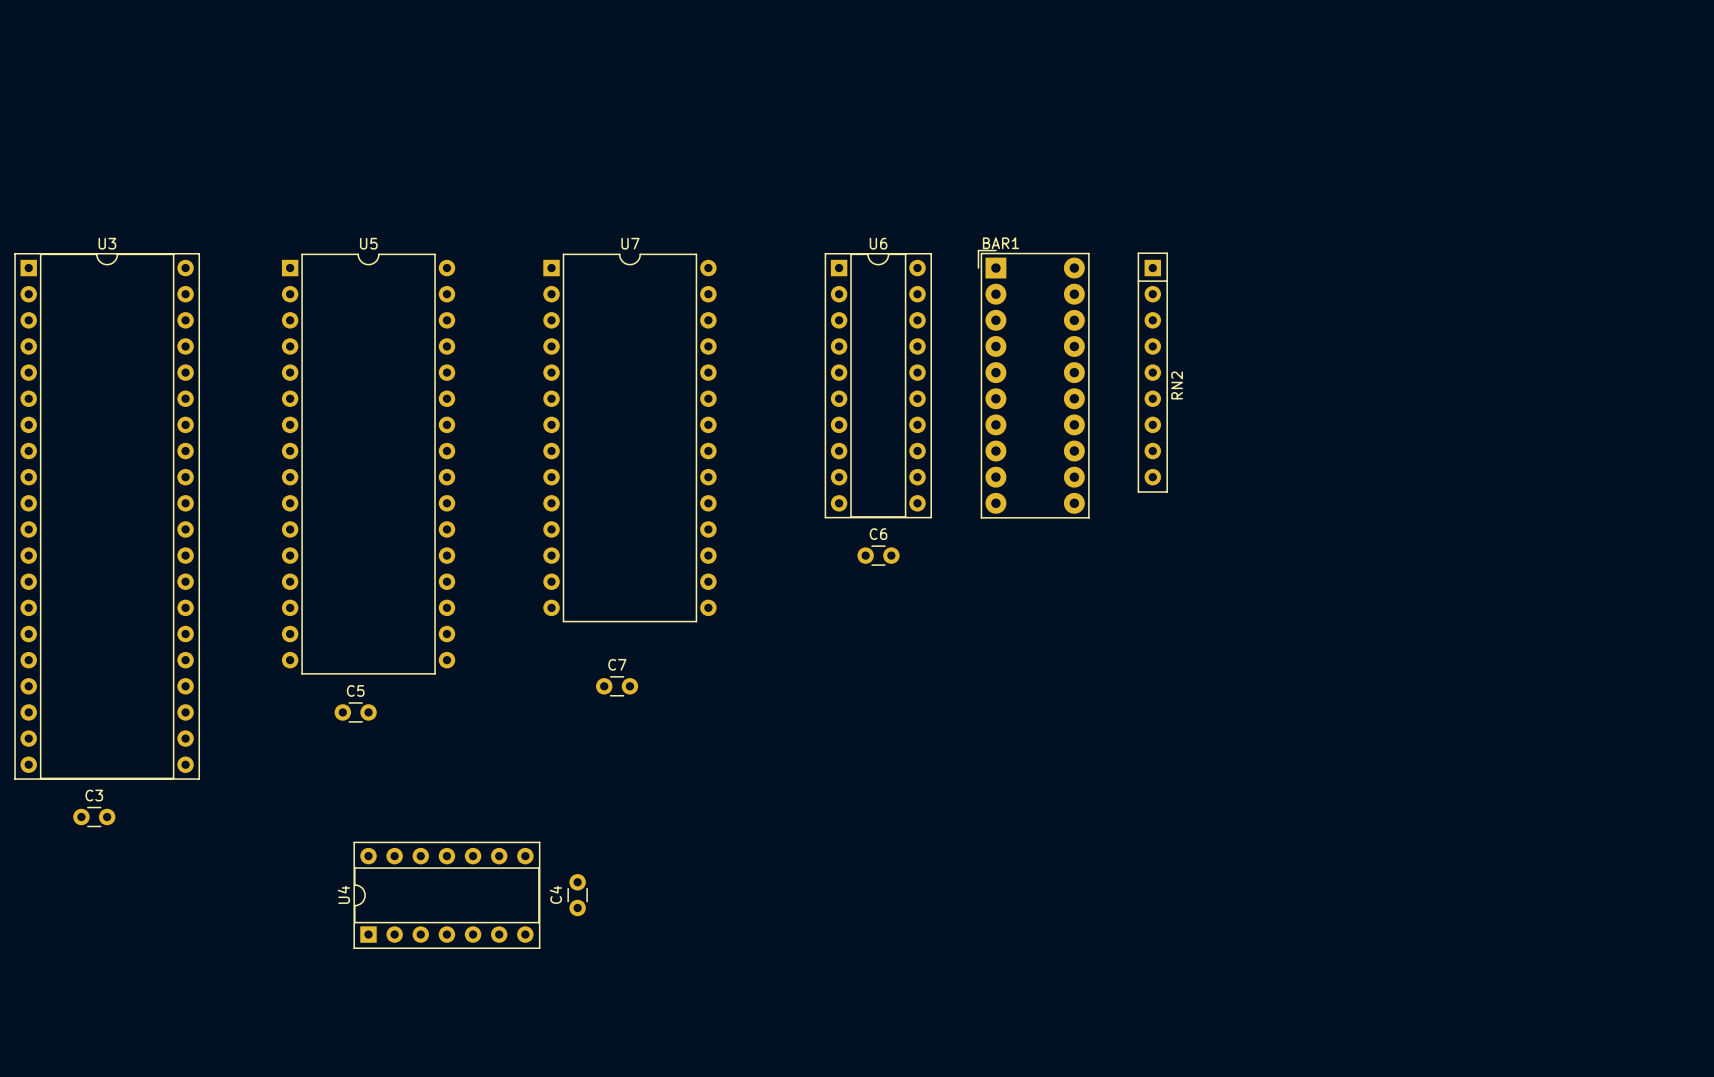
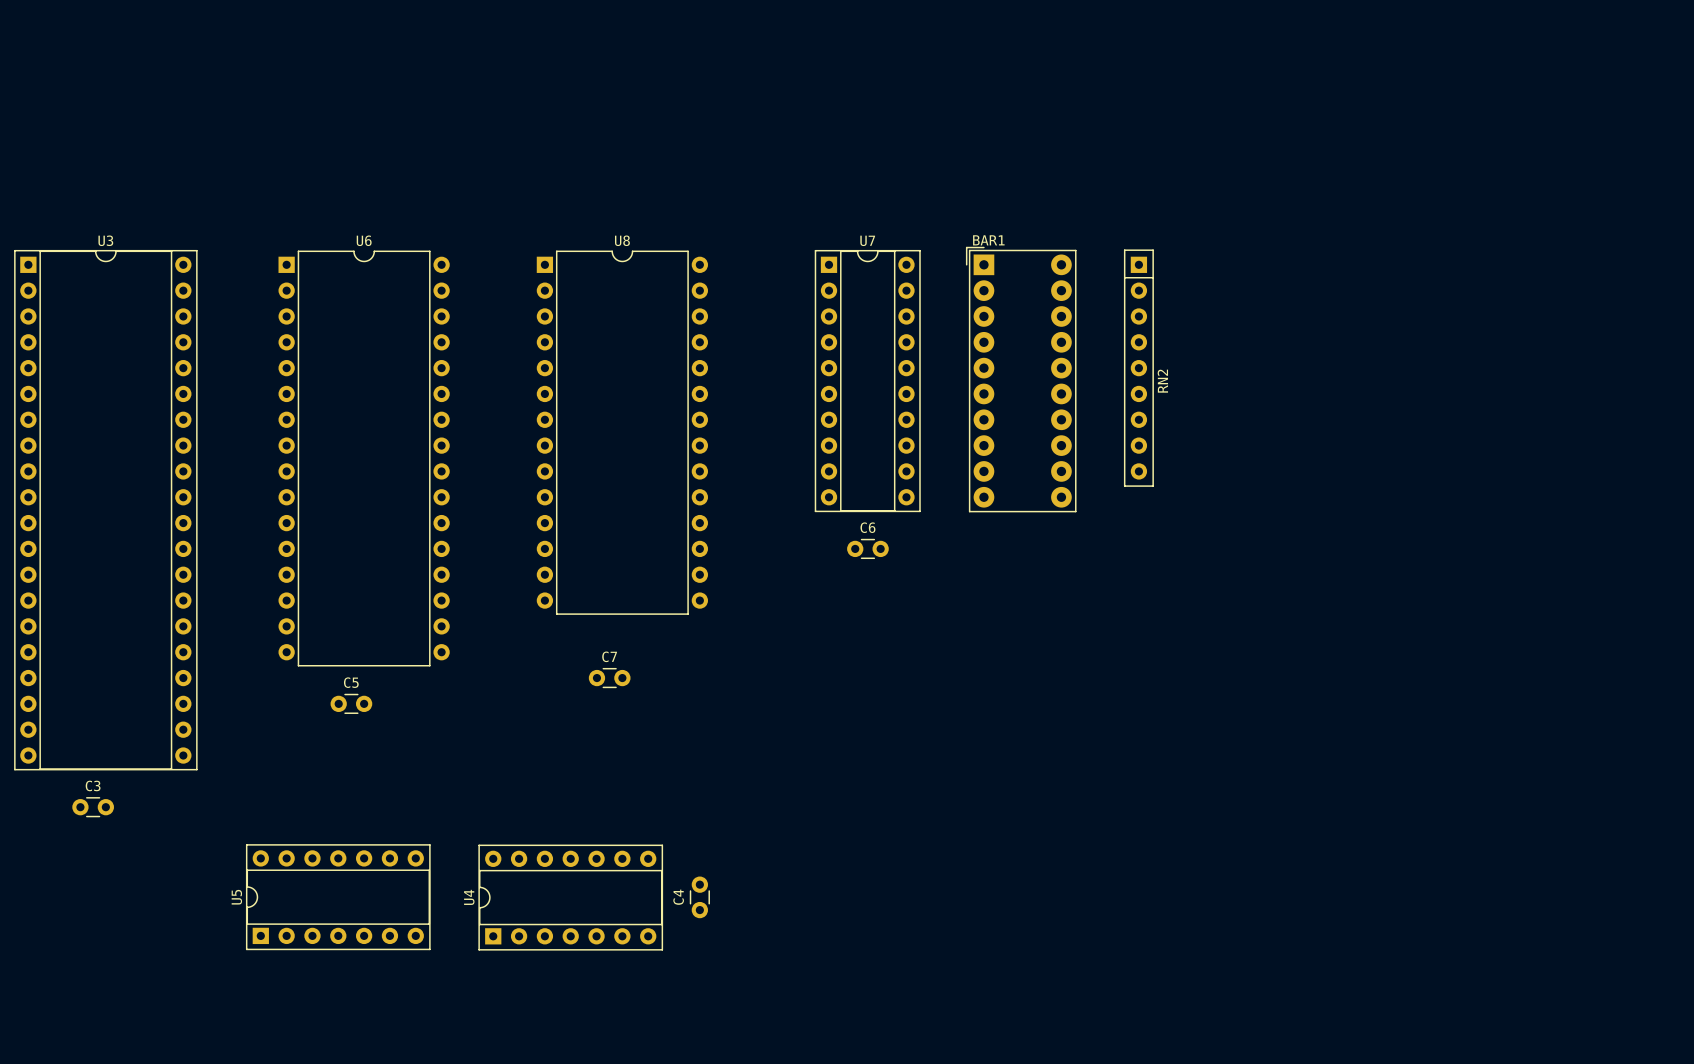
U5 name: U5 (368, 243) -> U6 (364, 240)
U7 name: U7 (630, 243) -> U8 (622, 240)
U6 name: U6 (878, 243) -> U7 (867, 240)
U4 position: (446, 895) -> (570, 897)
C4 position: (577, 895) -> (699, 897)
U5: none -> (338, 897)

